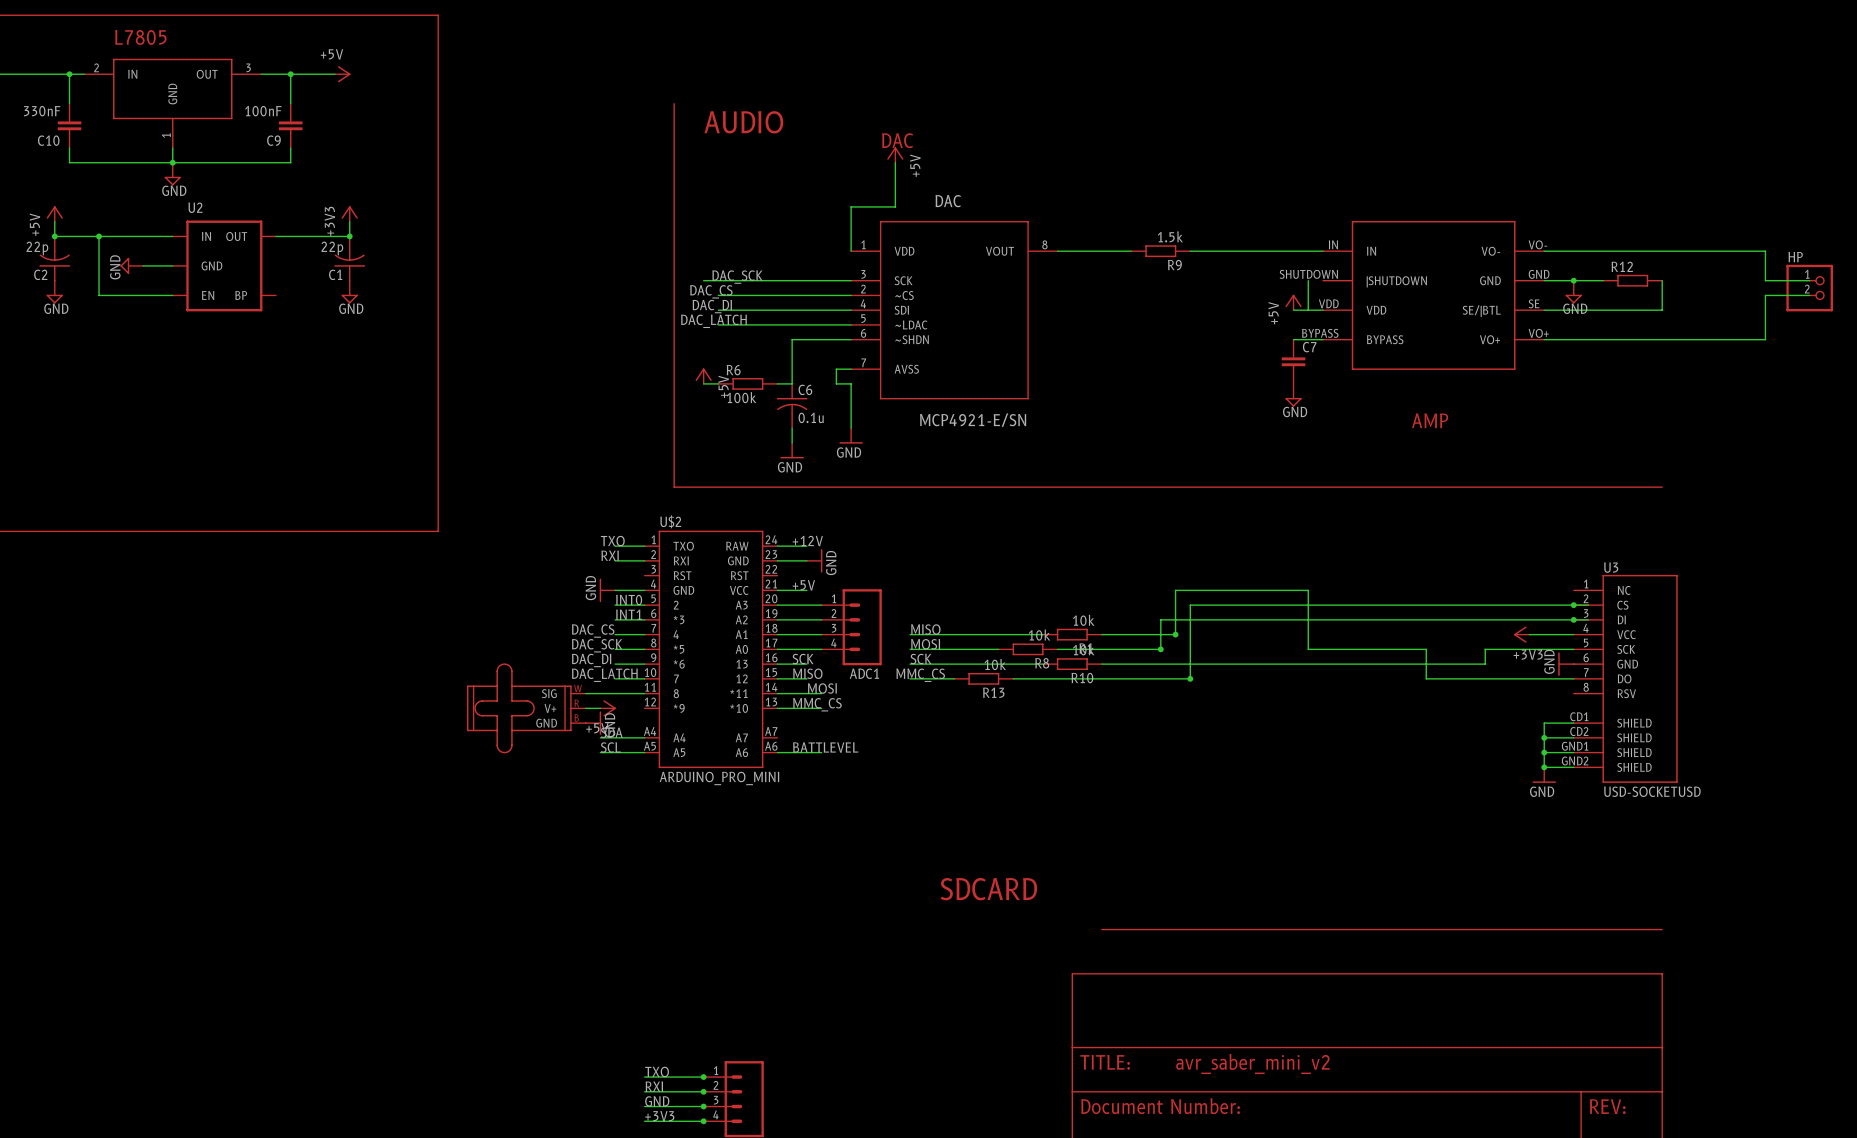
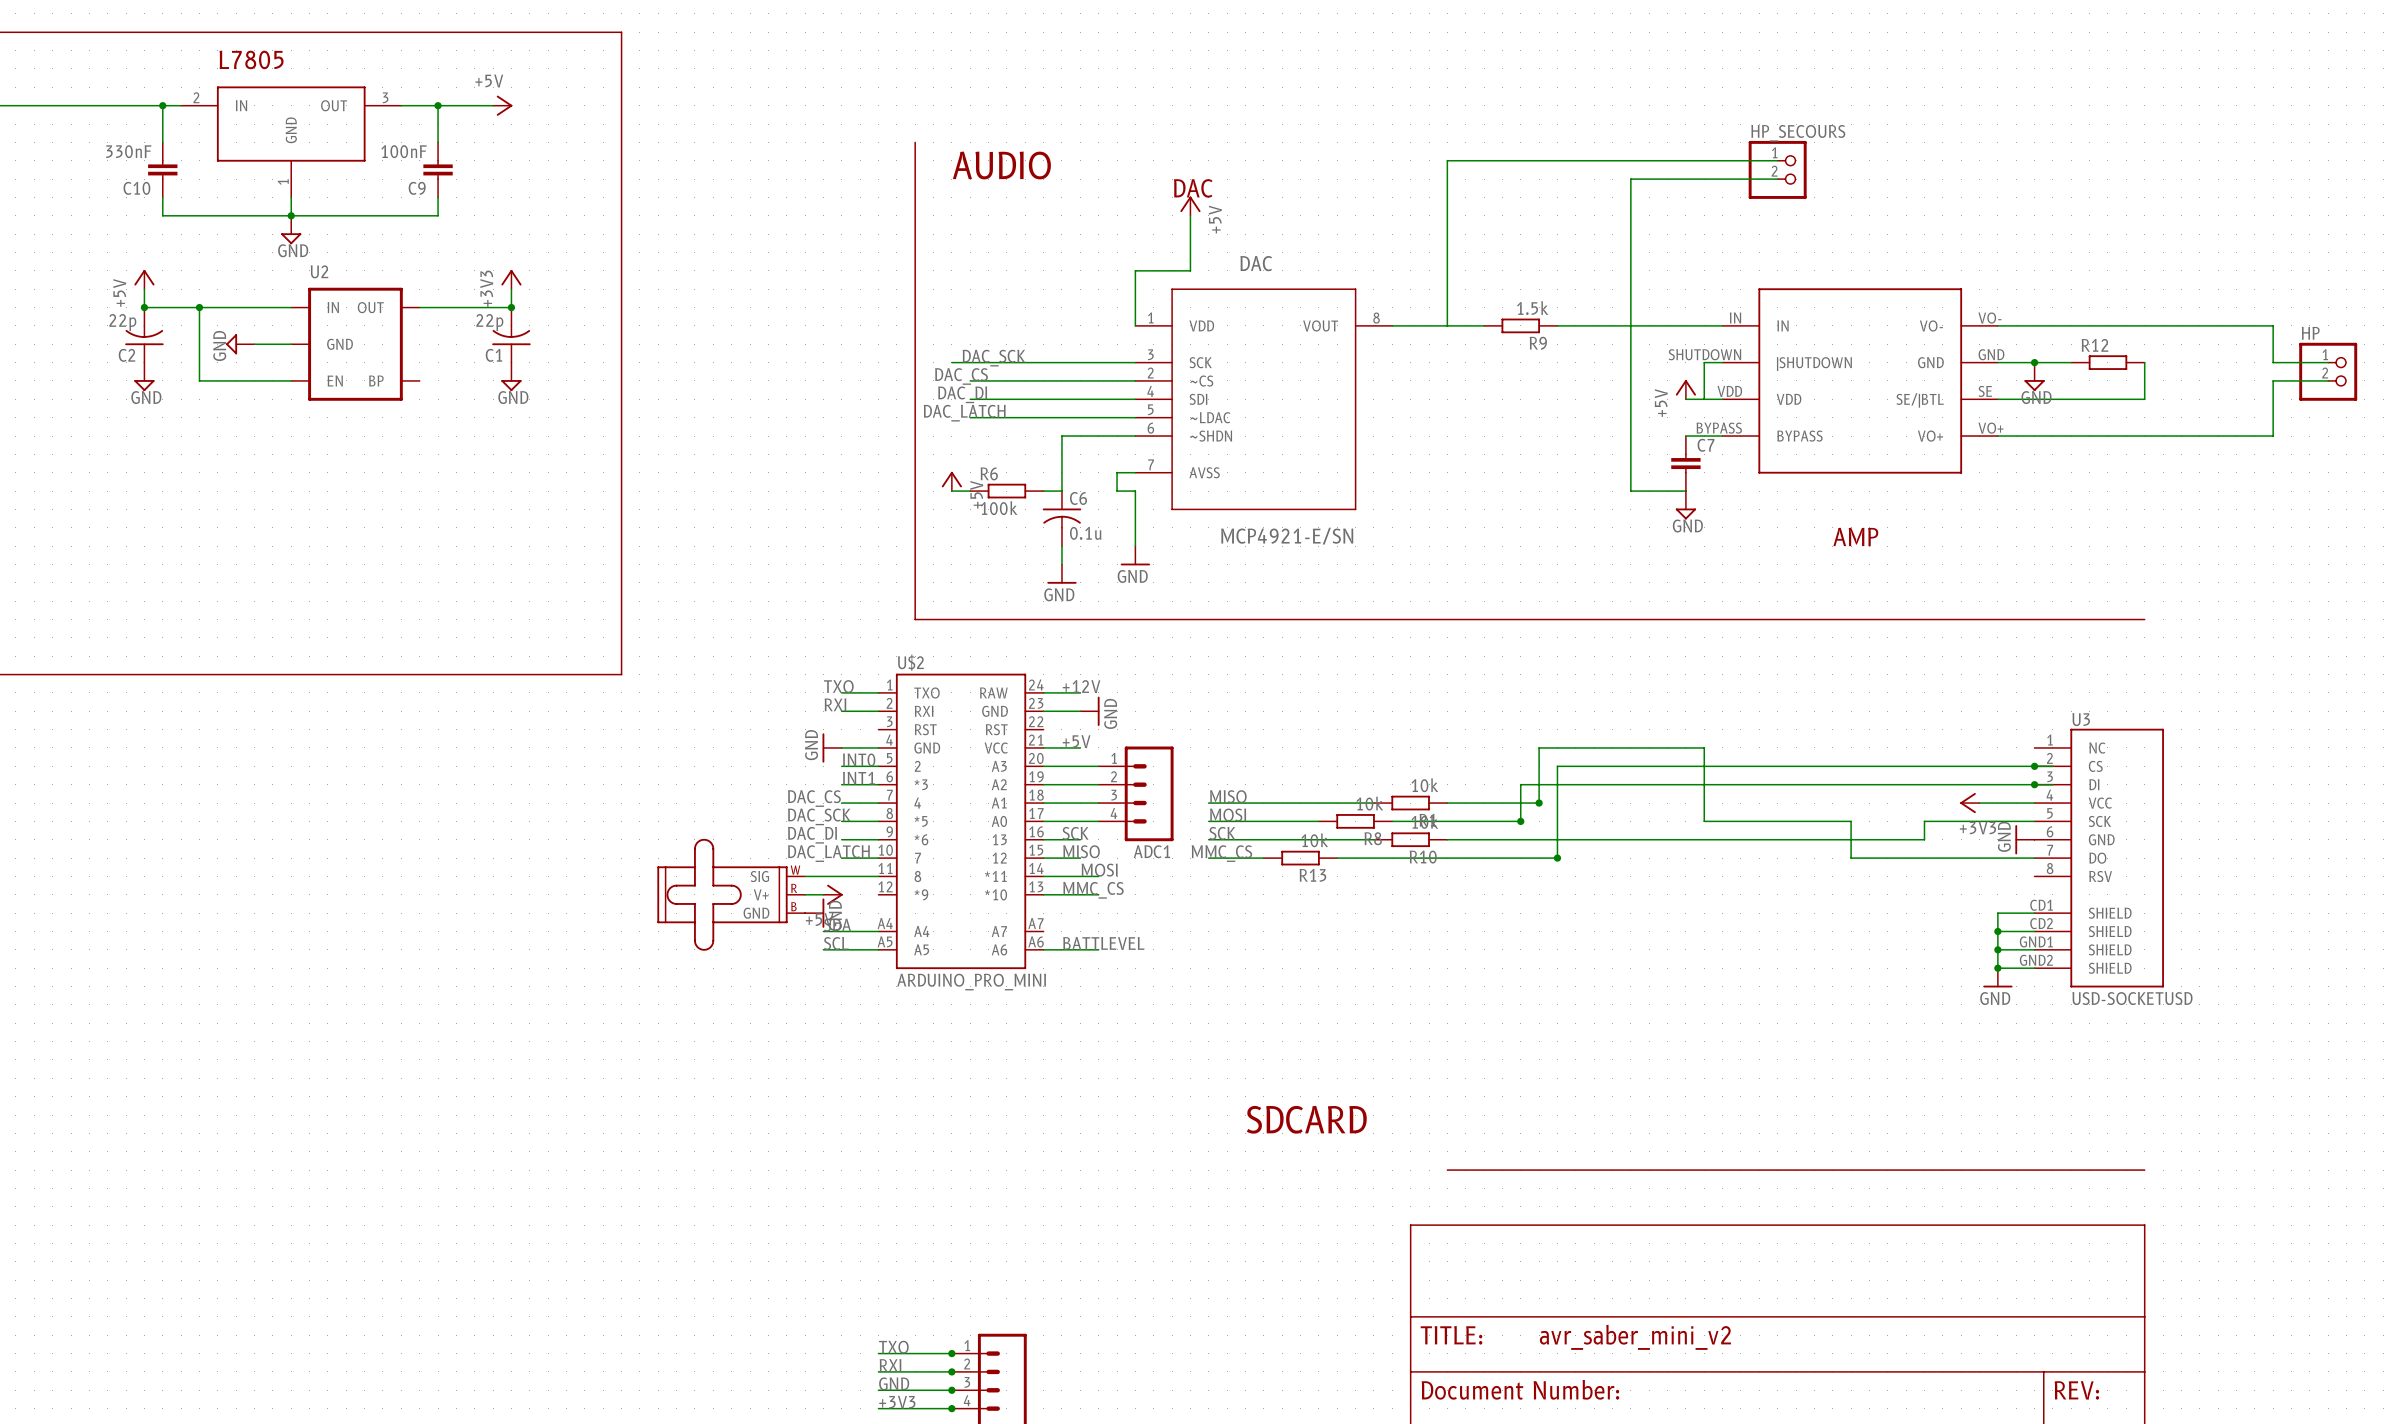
wire: none -> (1777, 160) (1447, 160) (1447, 325)
HP_SECOURS: none -> (1777, 169)
wire: none -> (1777, 179) (1630, 179) (1630, 491) (1685, 491)
wire: none -> (1704, 362) (1722, 362)

